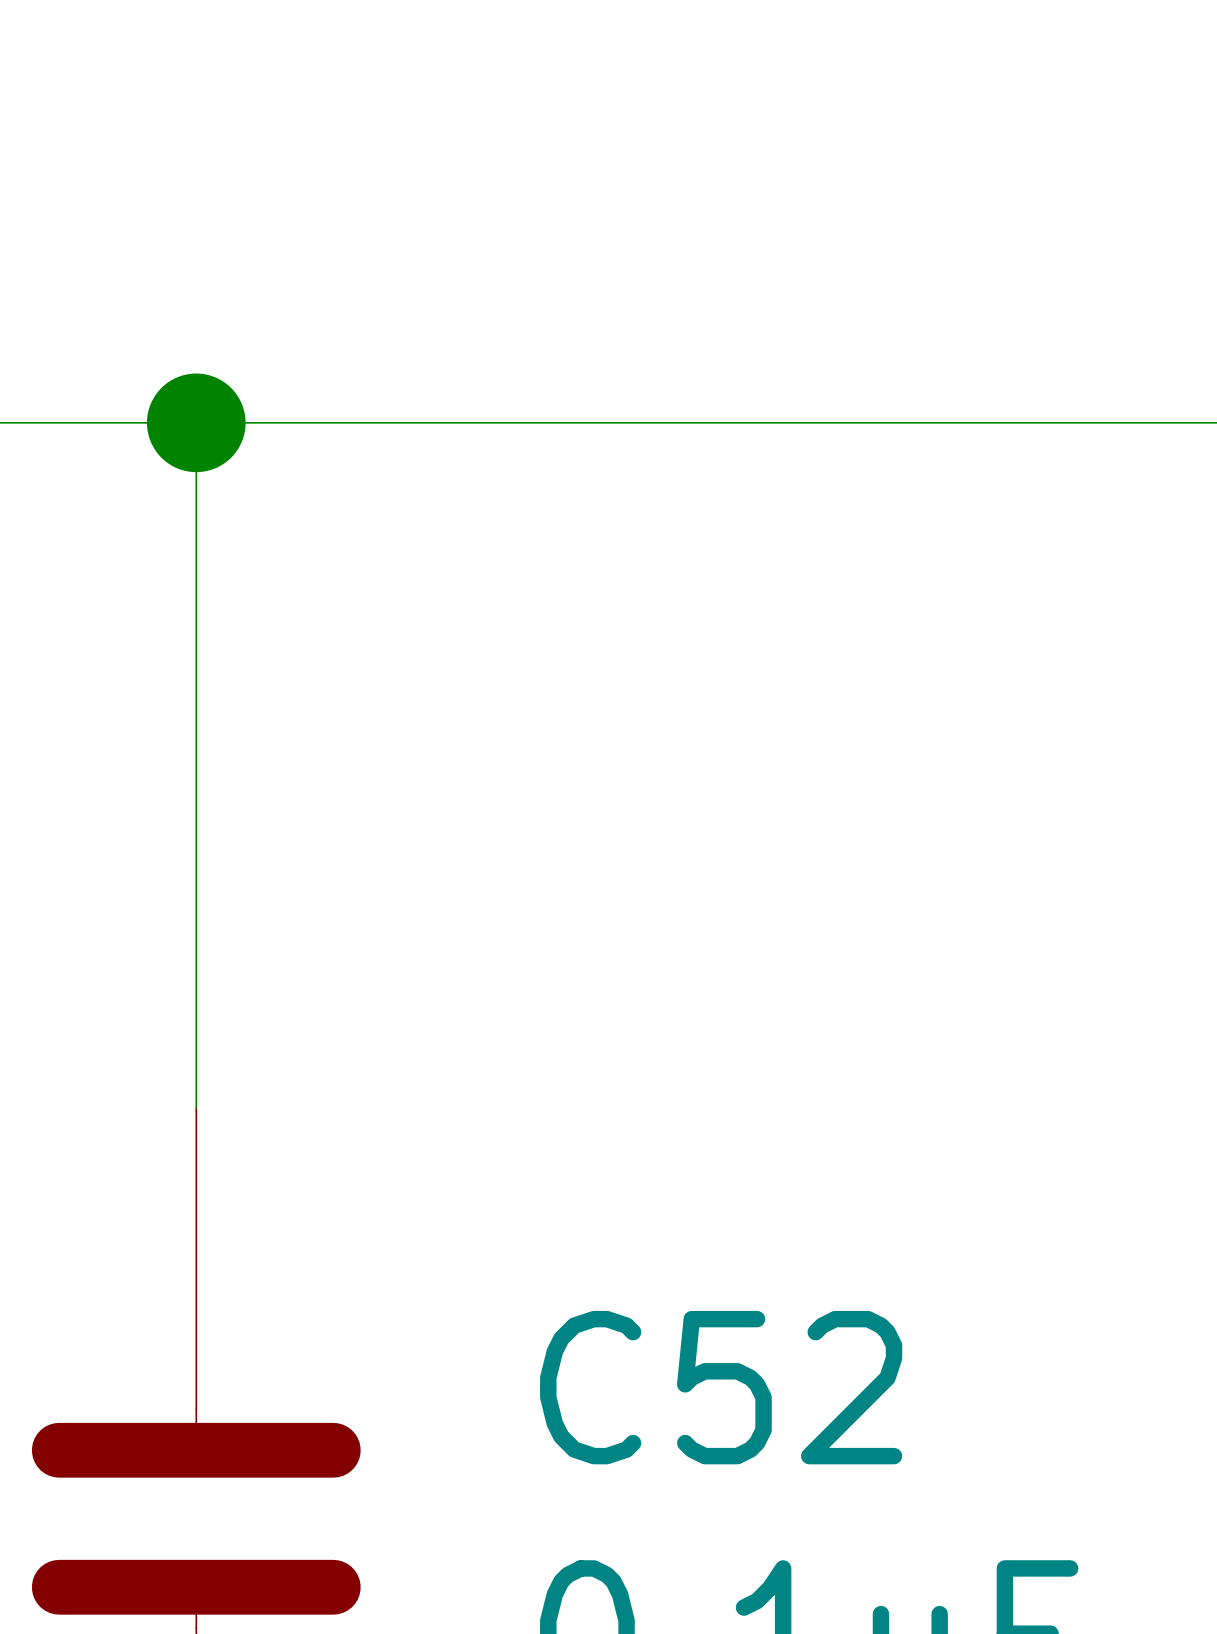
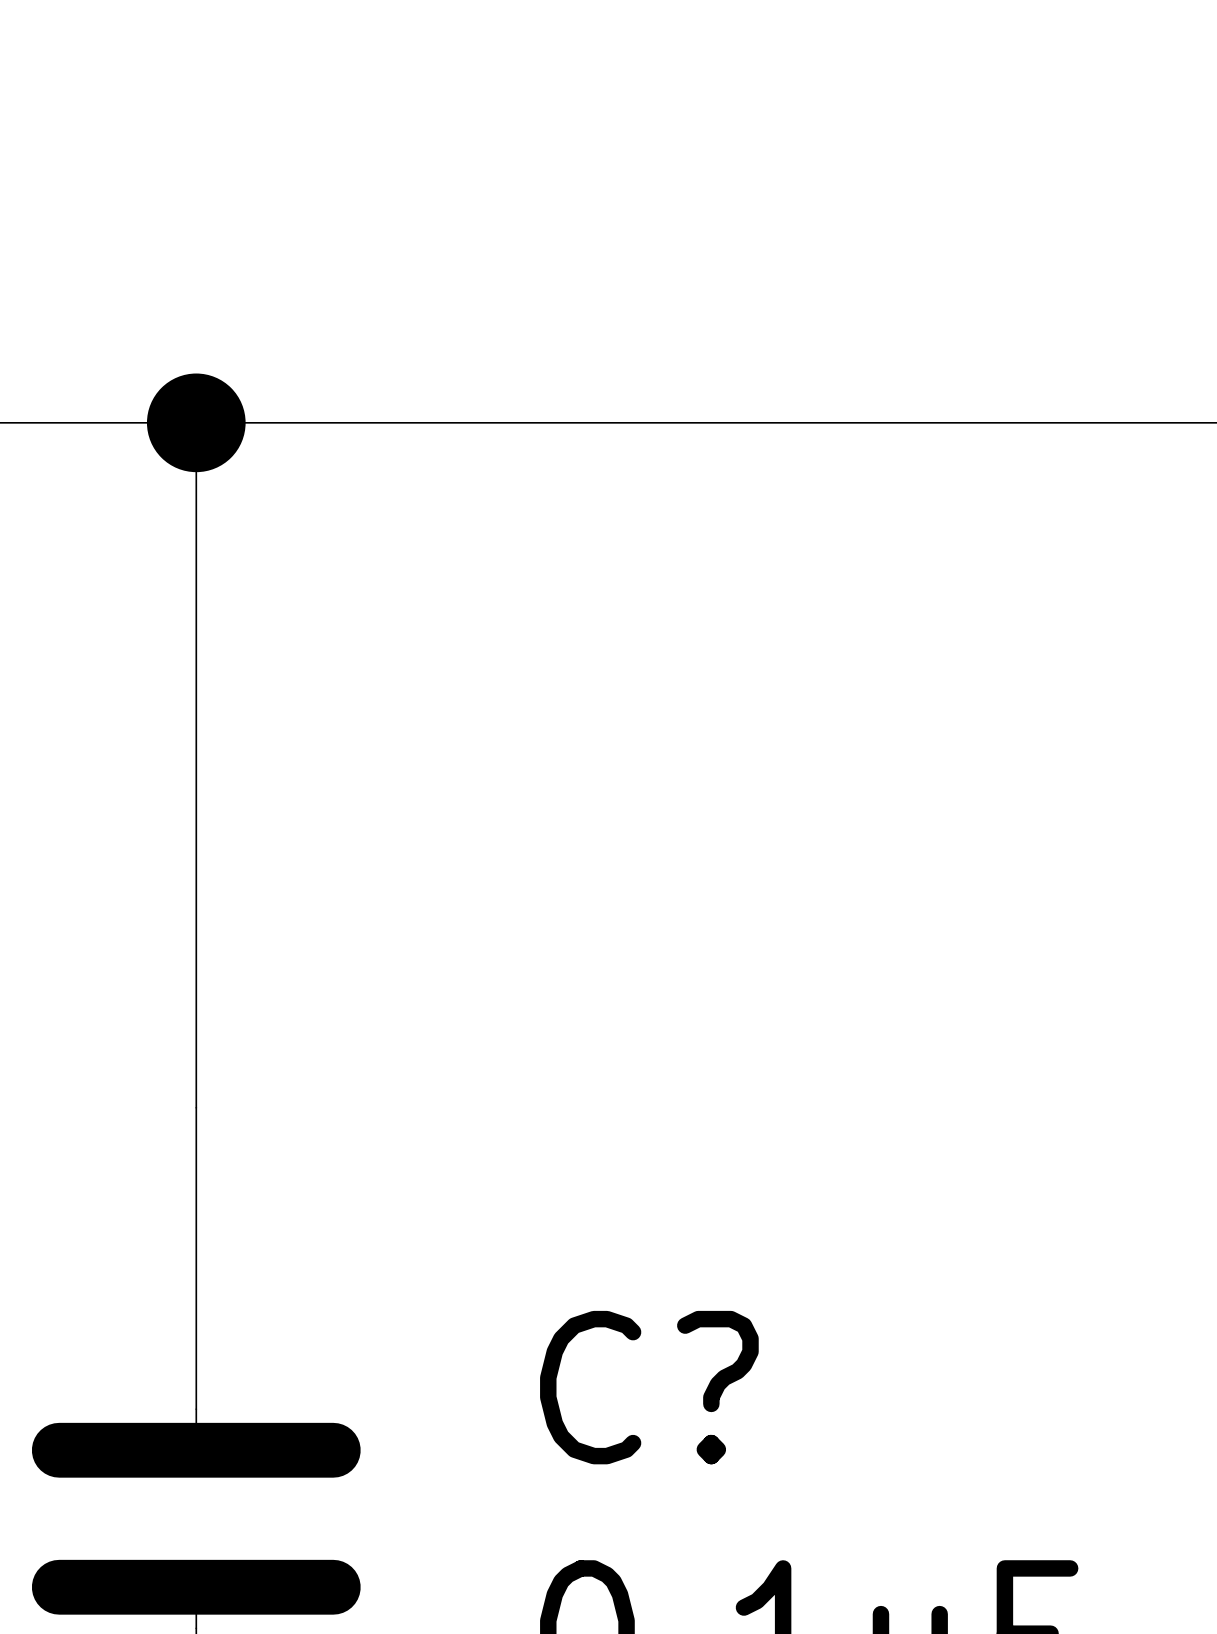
C52 name: C52 (721, 1387) -> C? (649, 1387)

